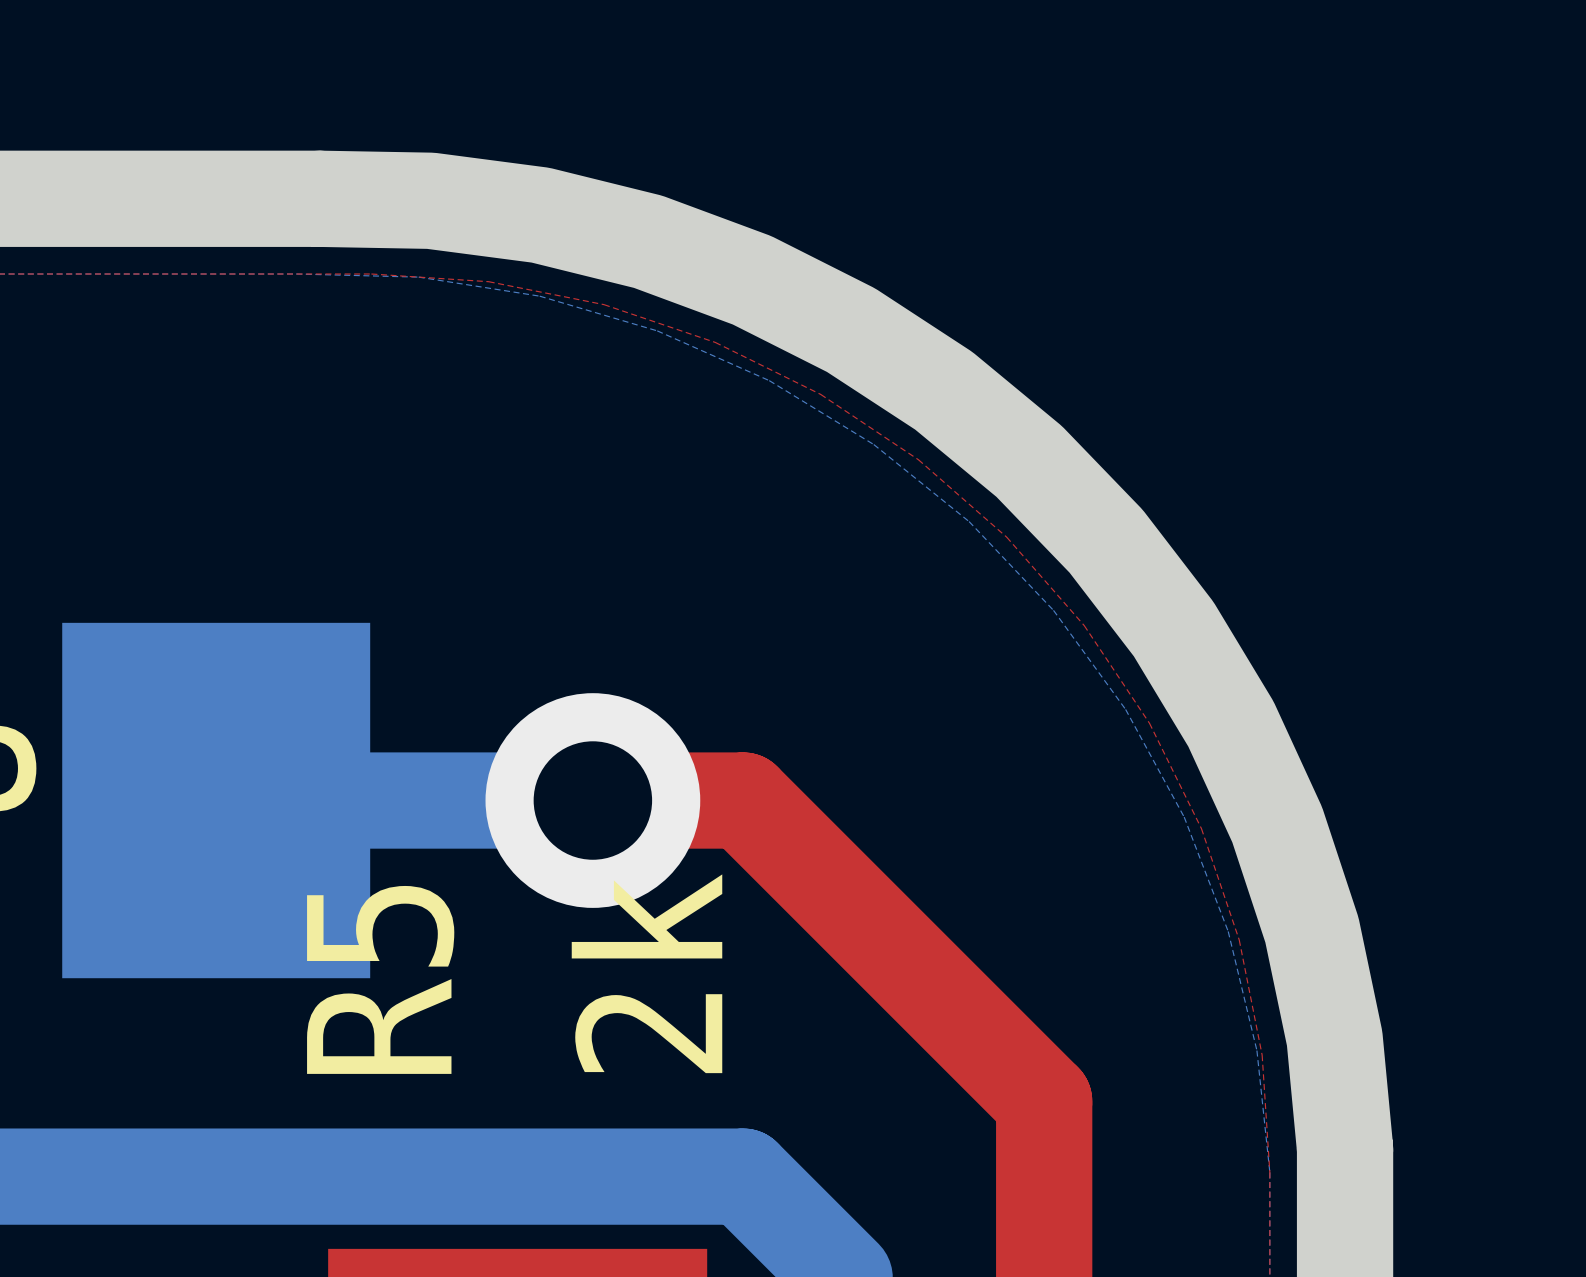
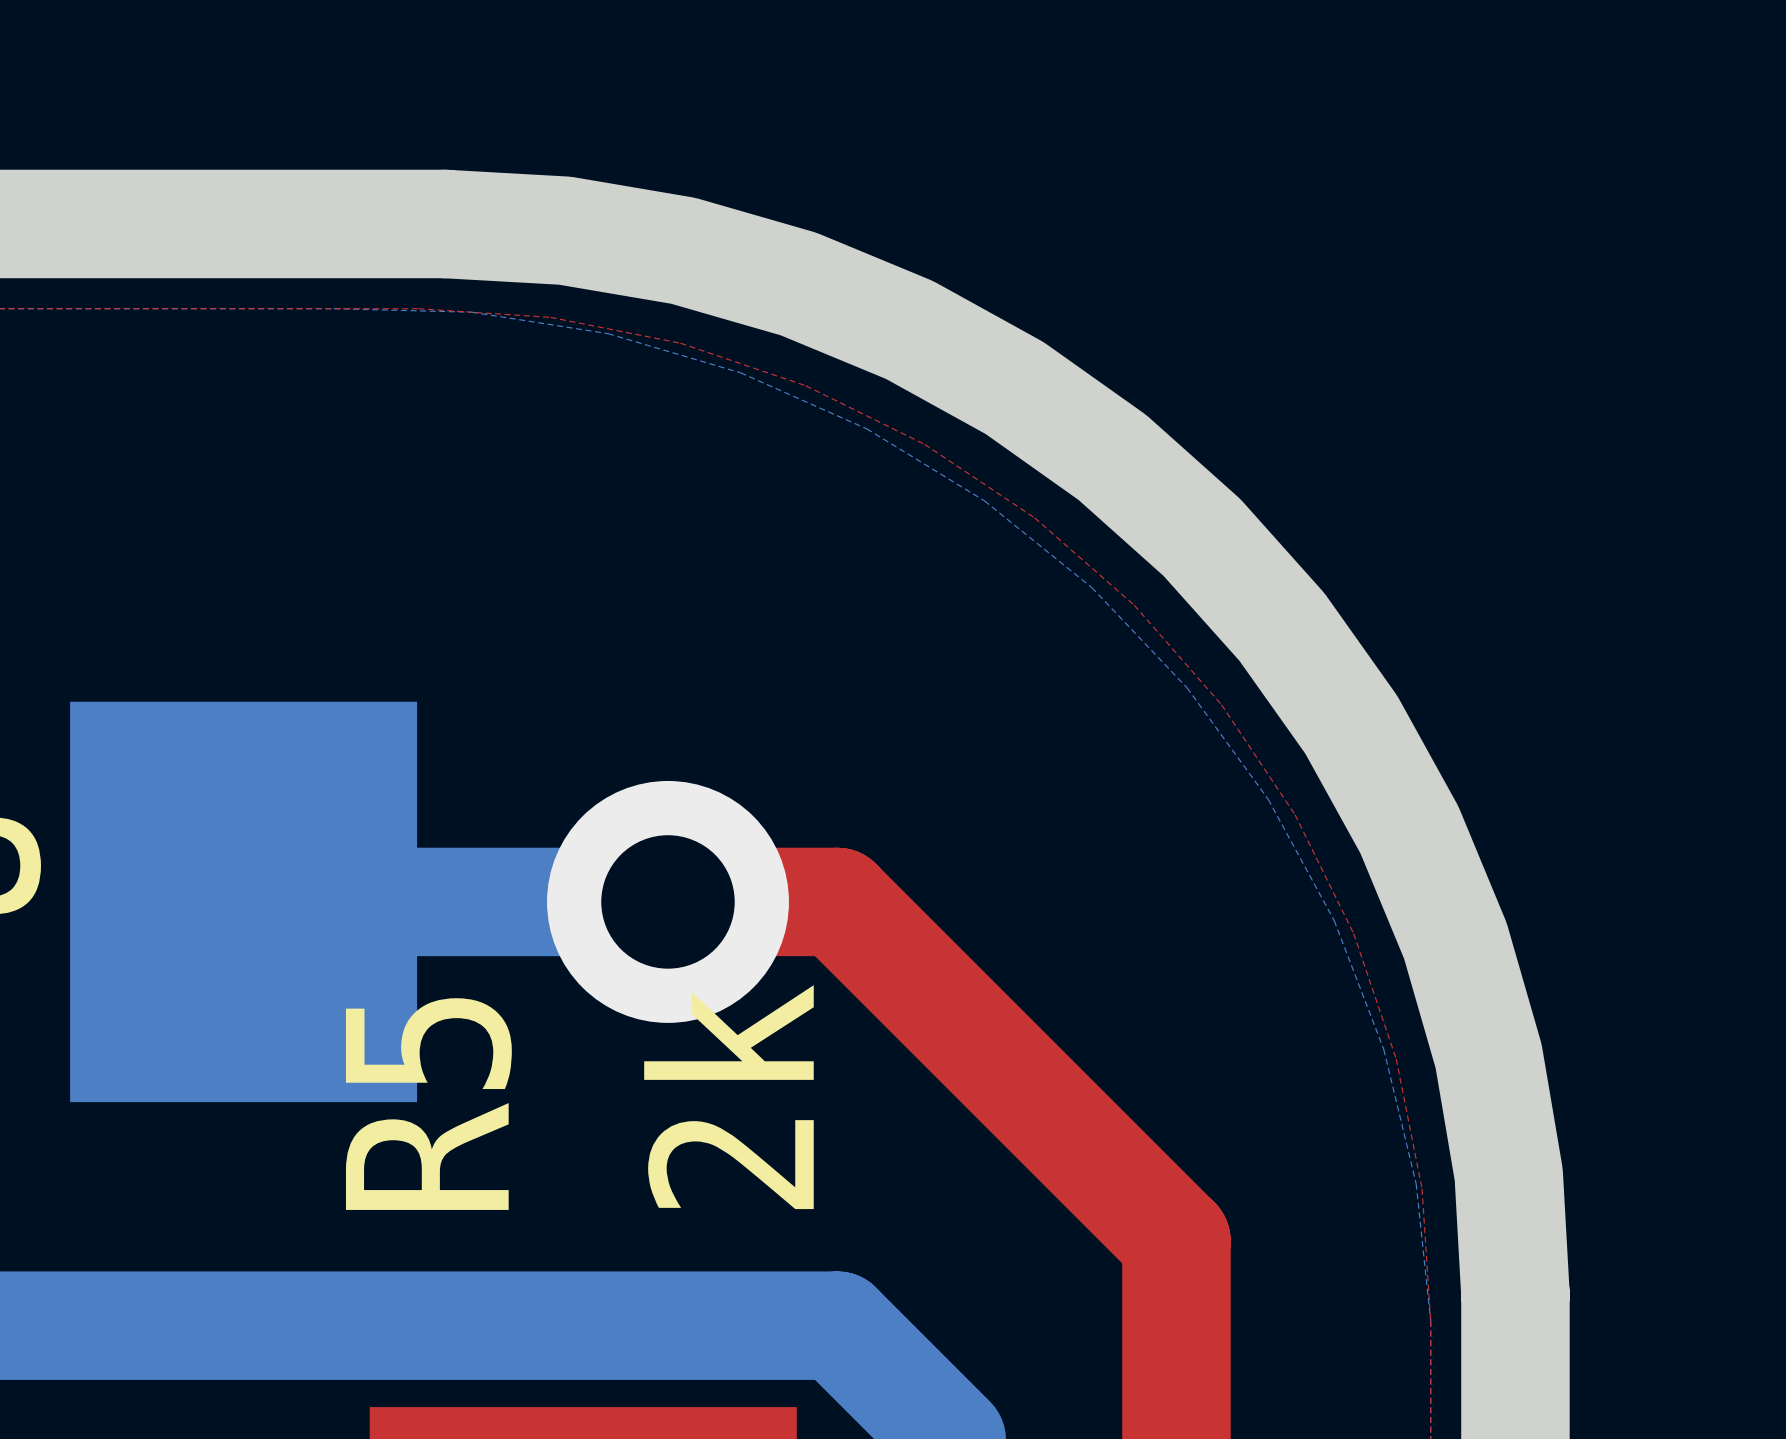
board edge: (319, 198) (430, 200) (540, 215) (648, 241) (752, 280) (851, 330) (943, 390) (1029, 461) (1106, 541) (1173, 629) (1230, 724) (1277, 824) (1311, 929) (1334, 1038) (1345, 1148) -> (360, 223) (445, 223) (564, 230) (683, 250) (798, 284) (909, 329) (1014, 388) (1112, 457) (1201, 537) (1281, 626) (1351, 724) (1409, 829) (1455, 940) (1488, 1056) (1508, 1174) (1515, 1294)

